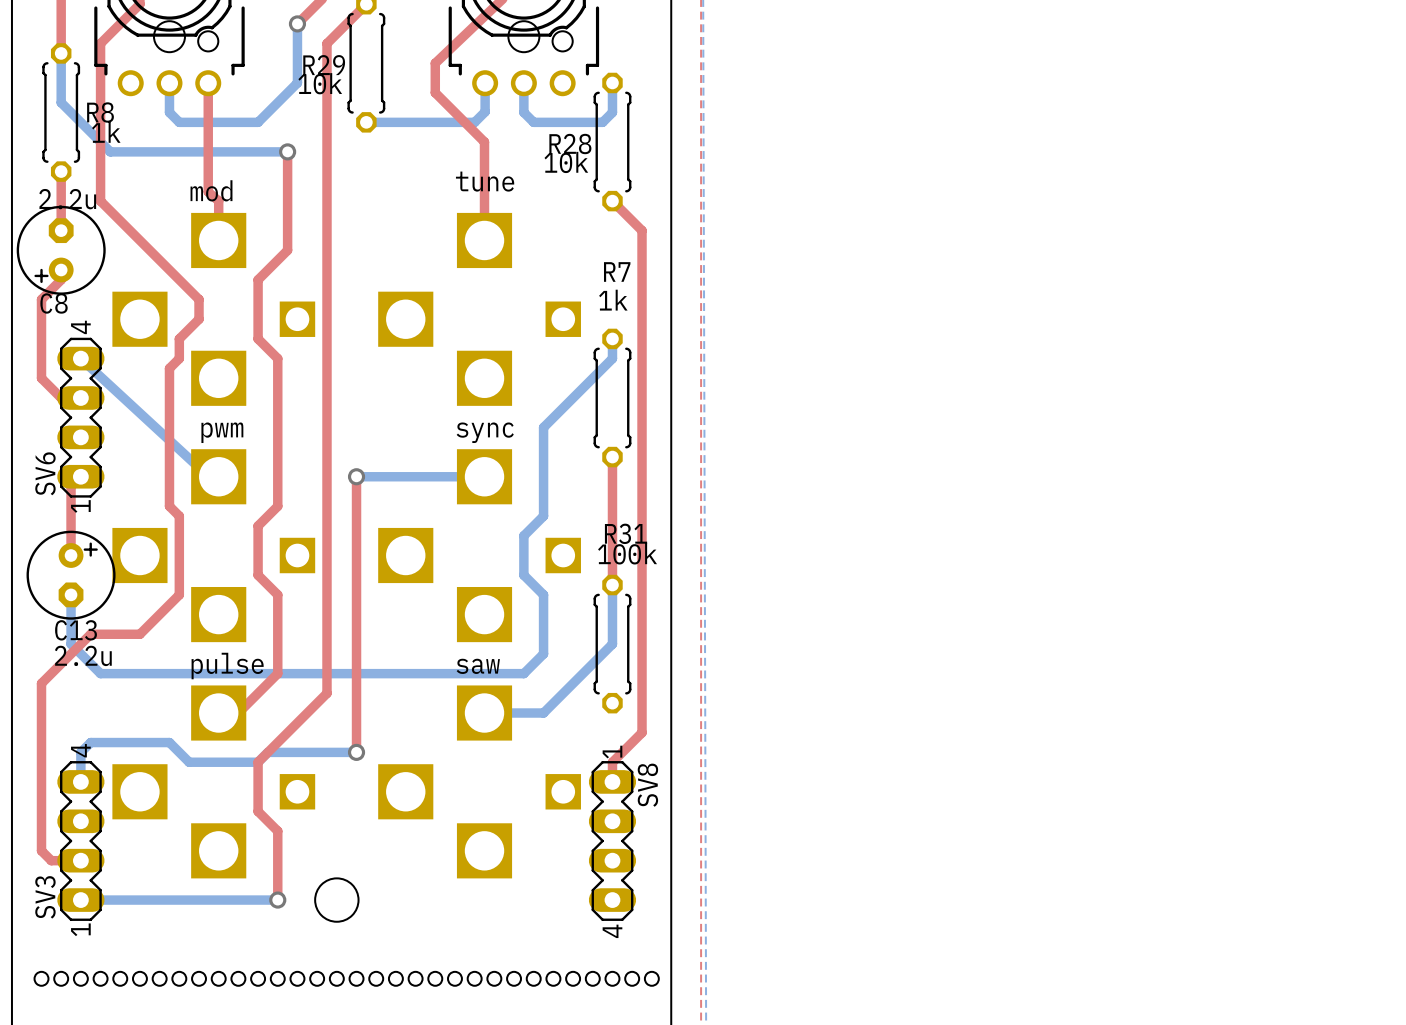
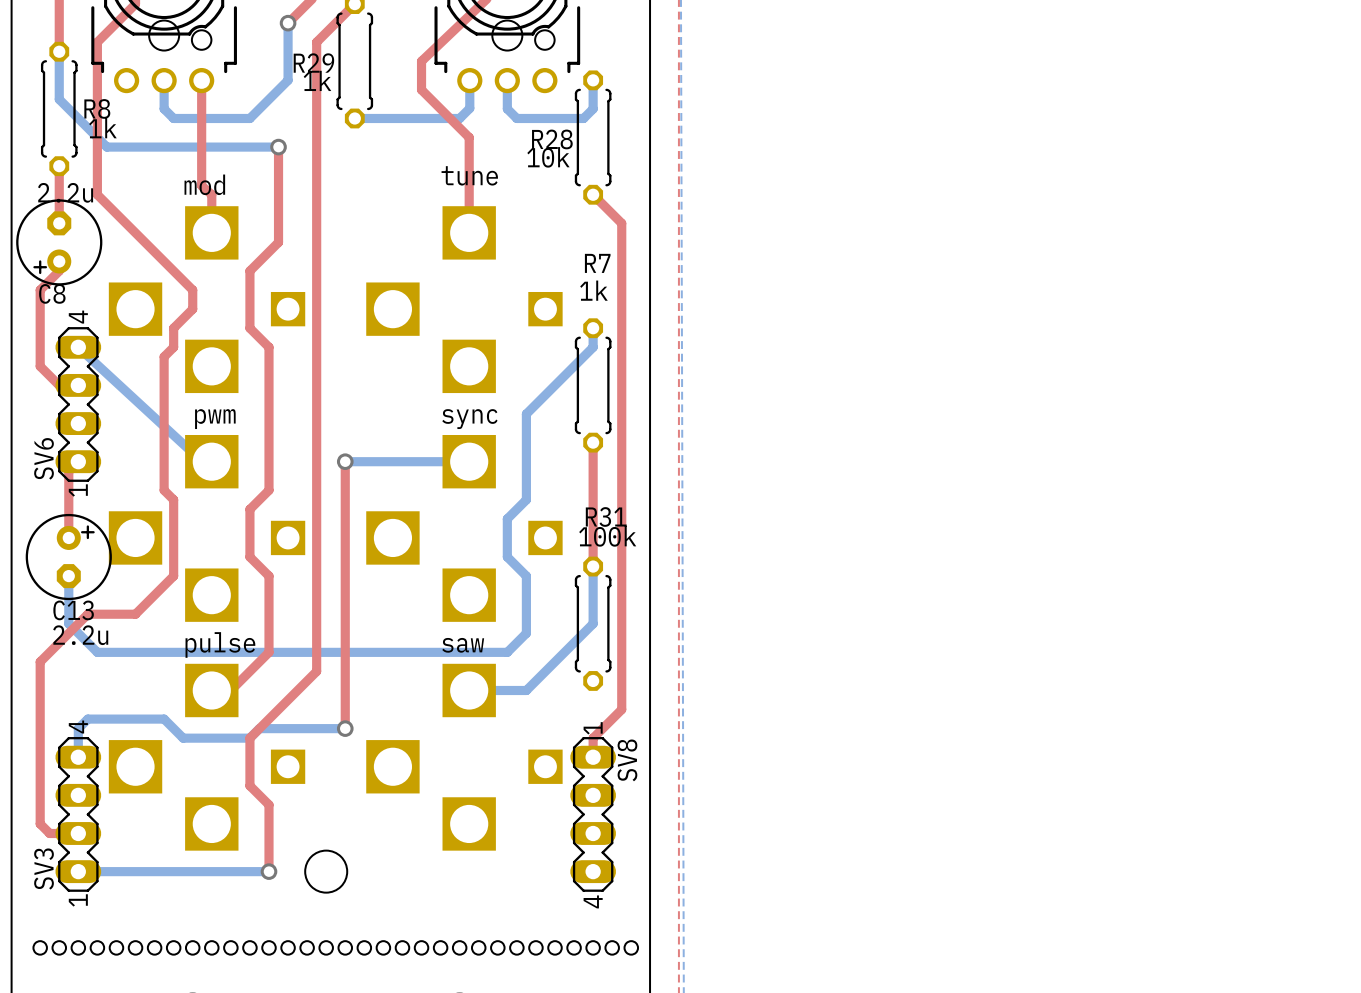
R29 value: 10k (320, 83) -> 1k (317, 80)

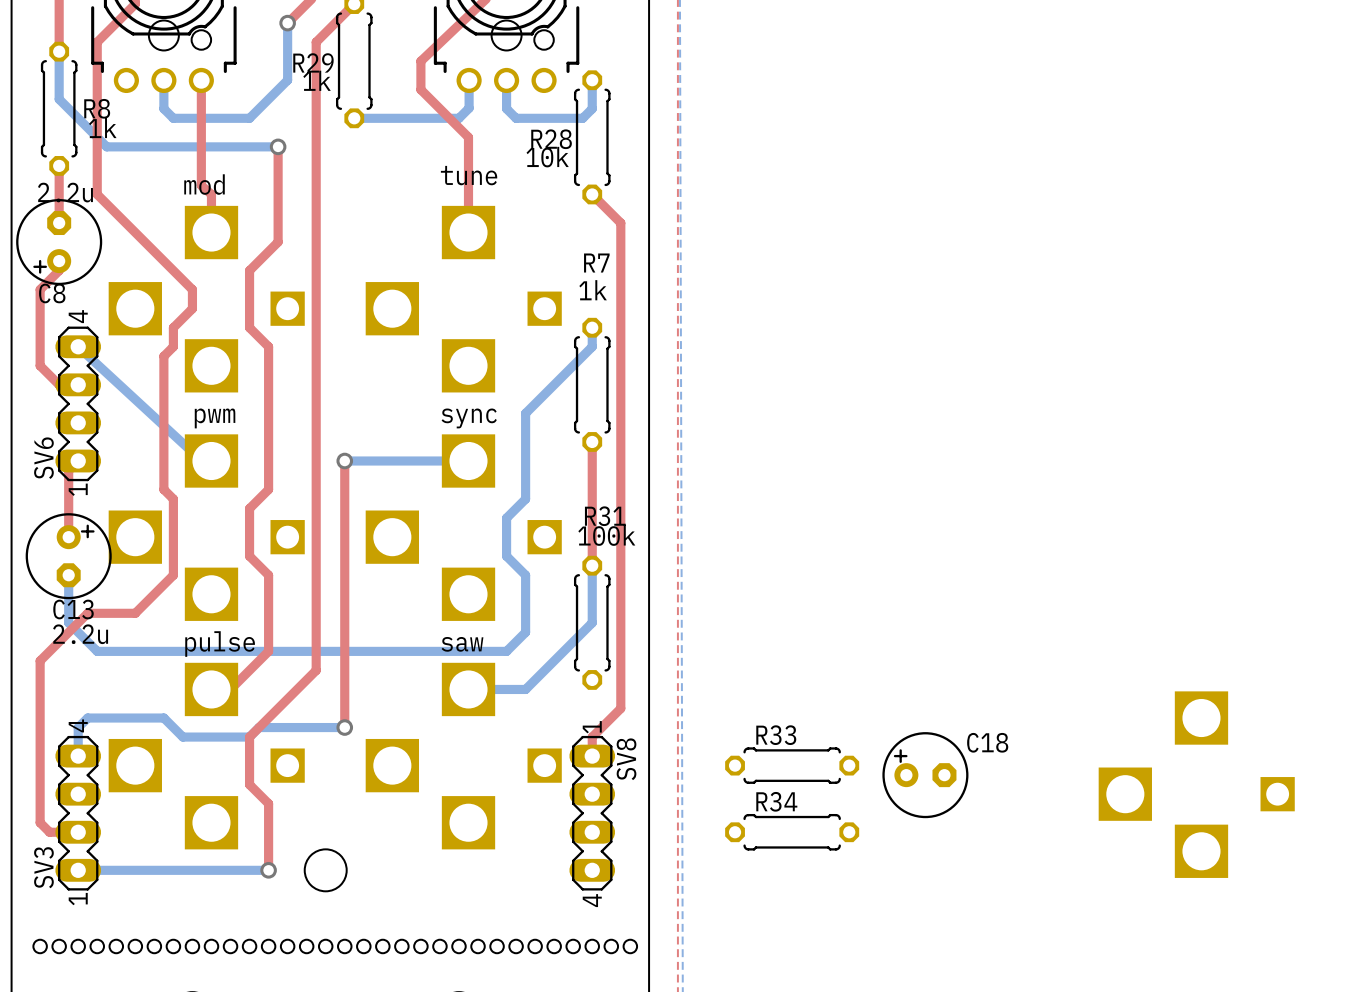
R33: none -> (792, 765)
C18: none -> (925, 775)
part: none -> (1196, 784)
R34: none -> (792, 832)

